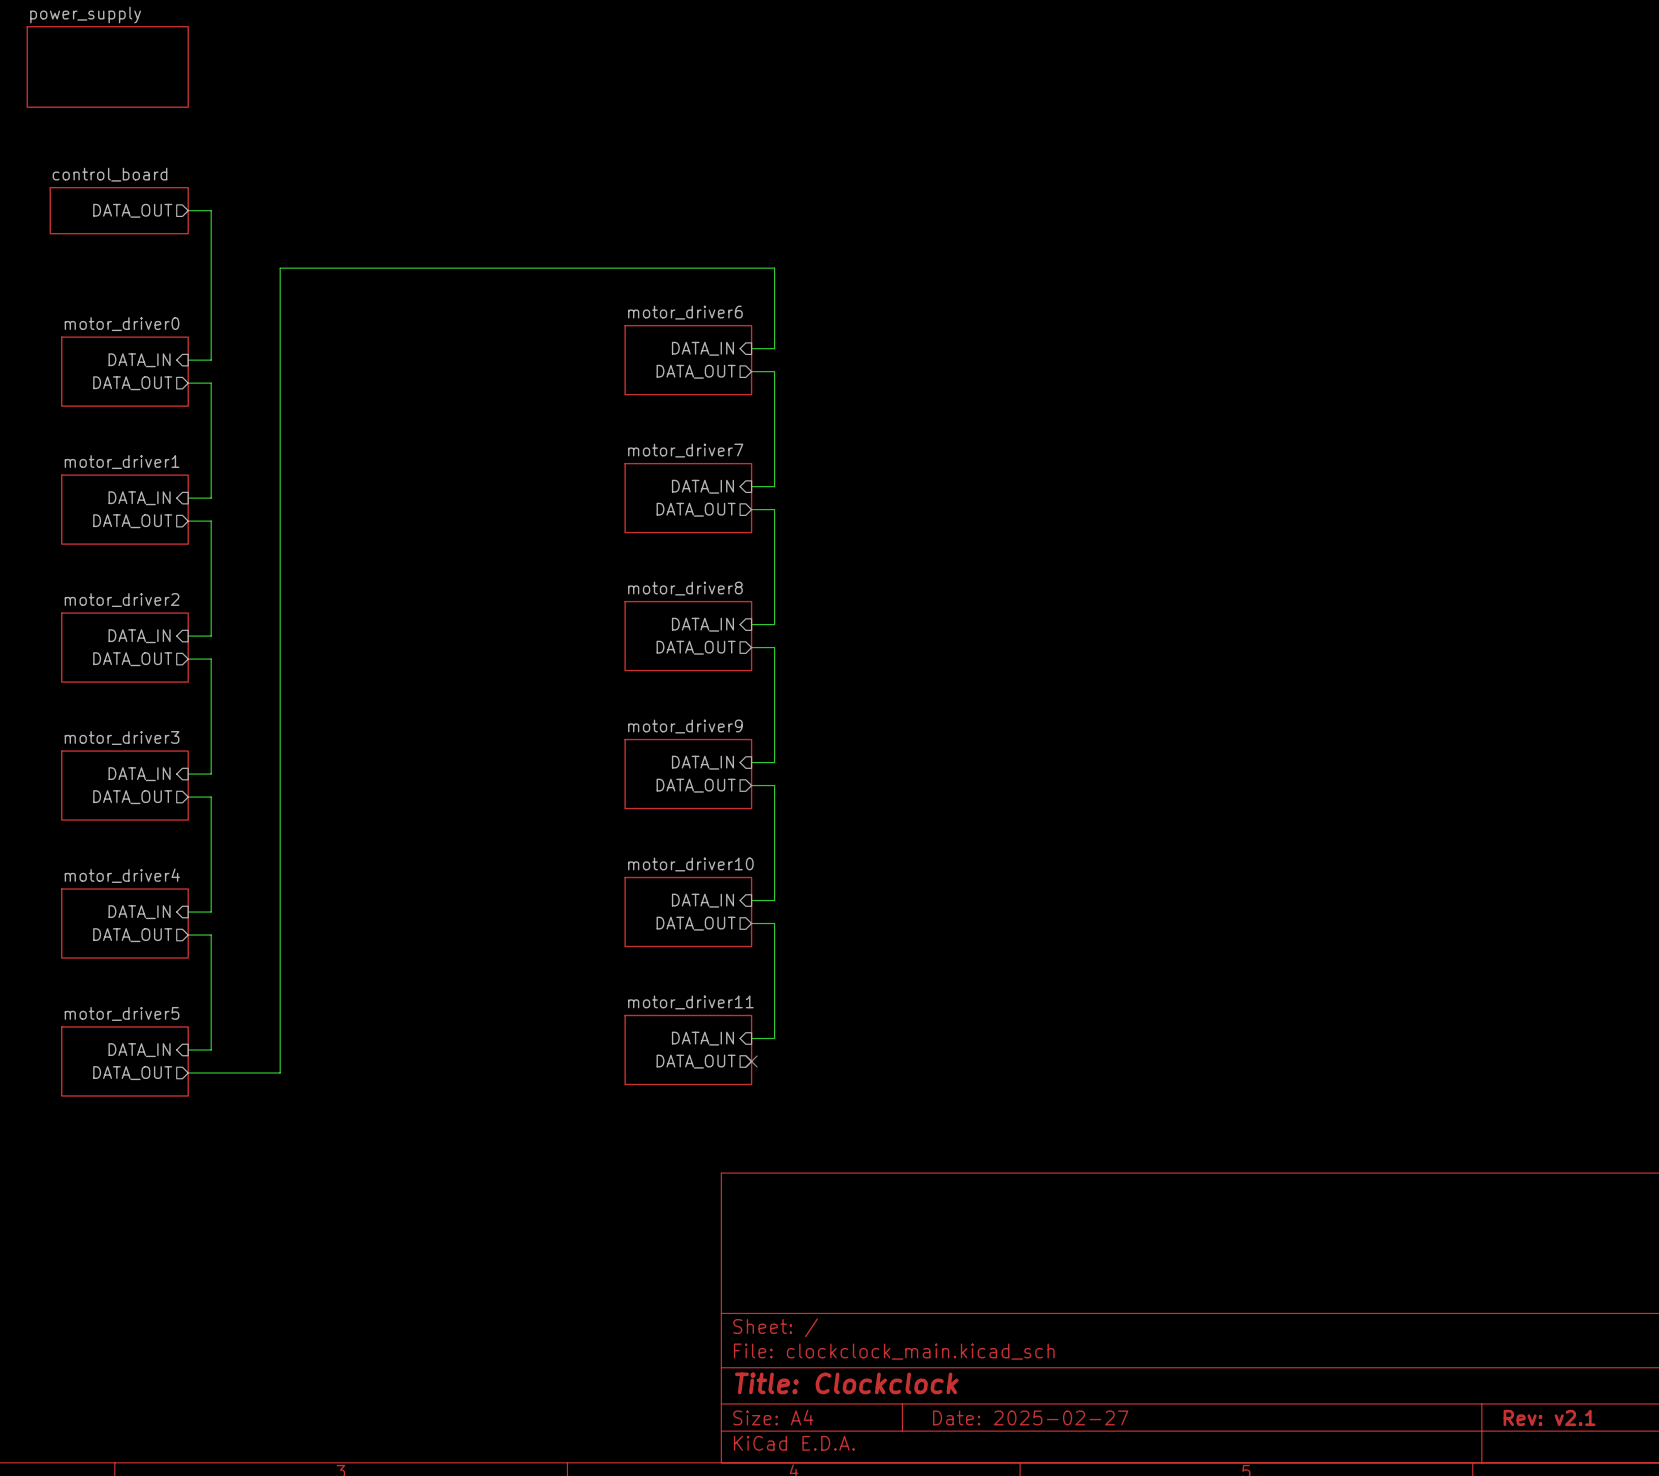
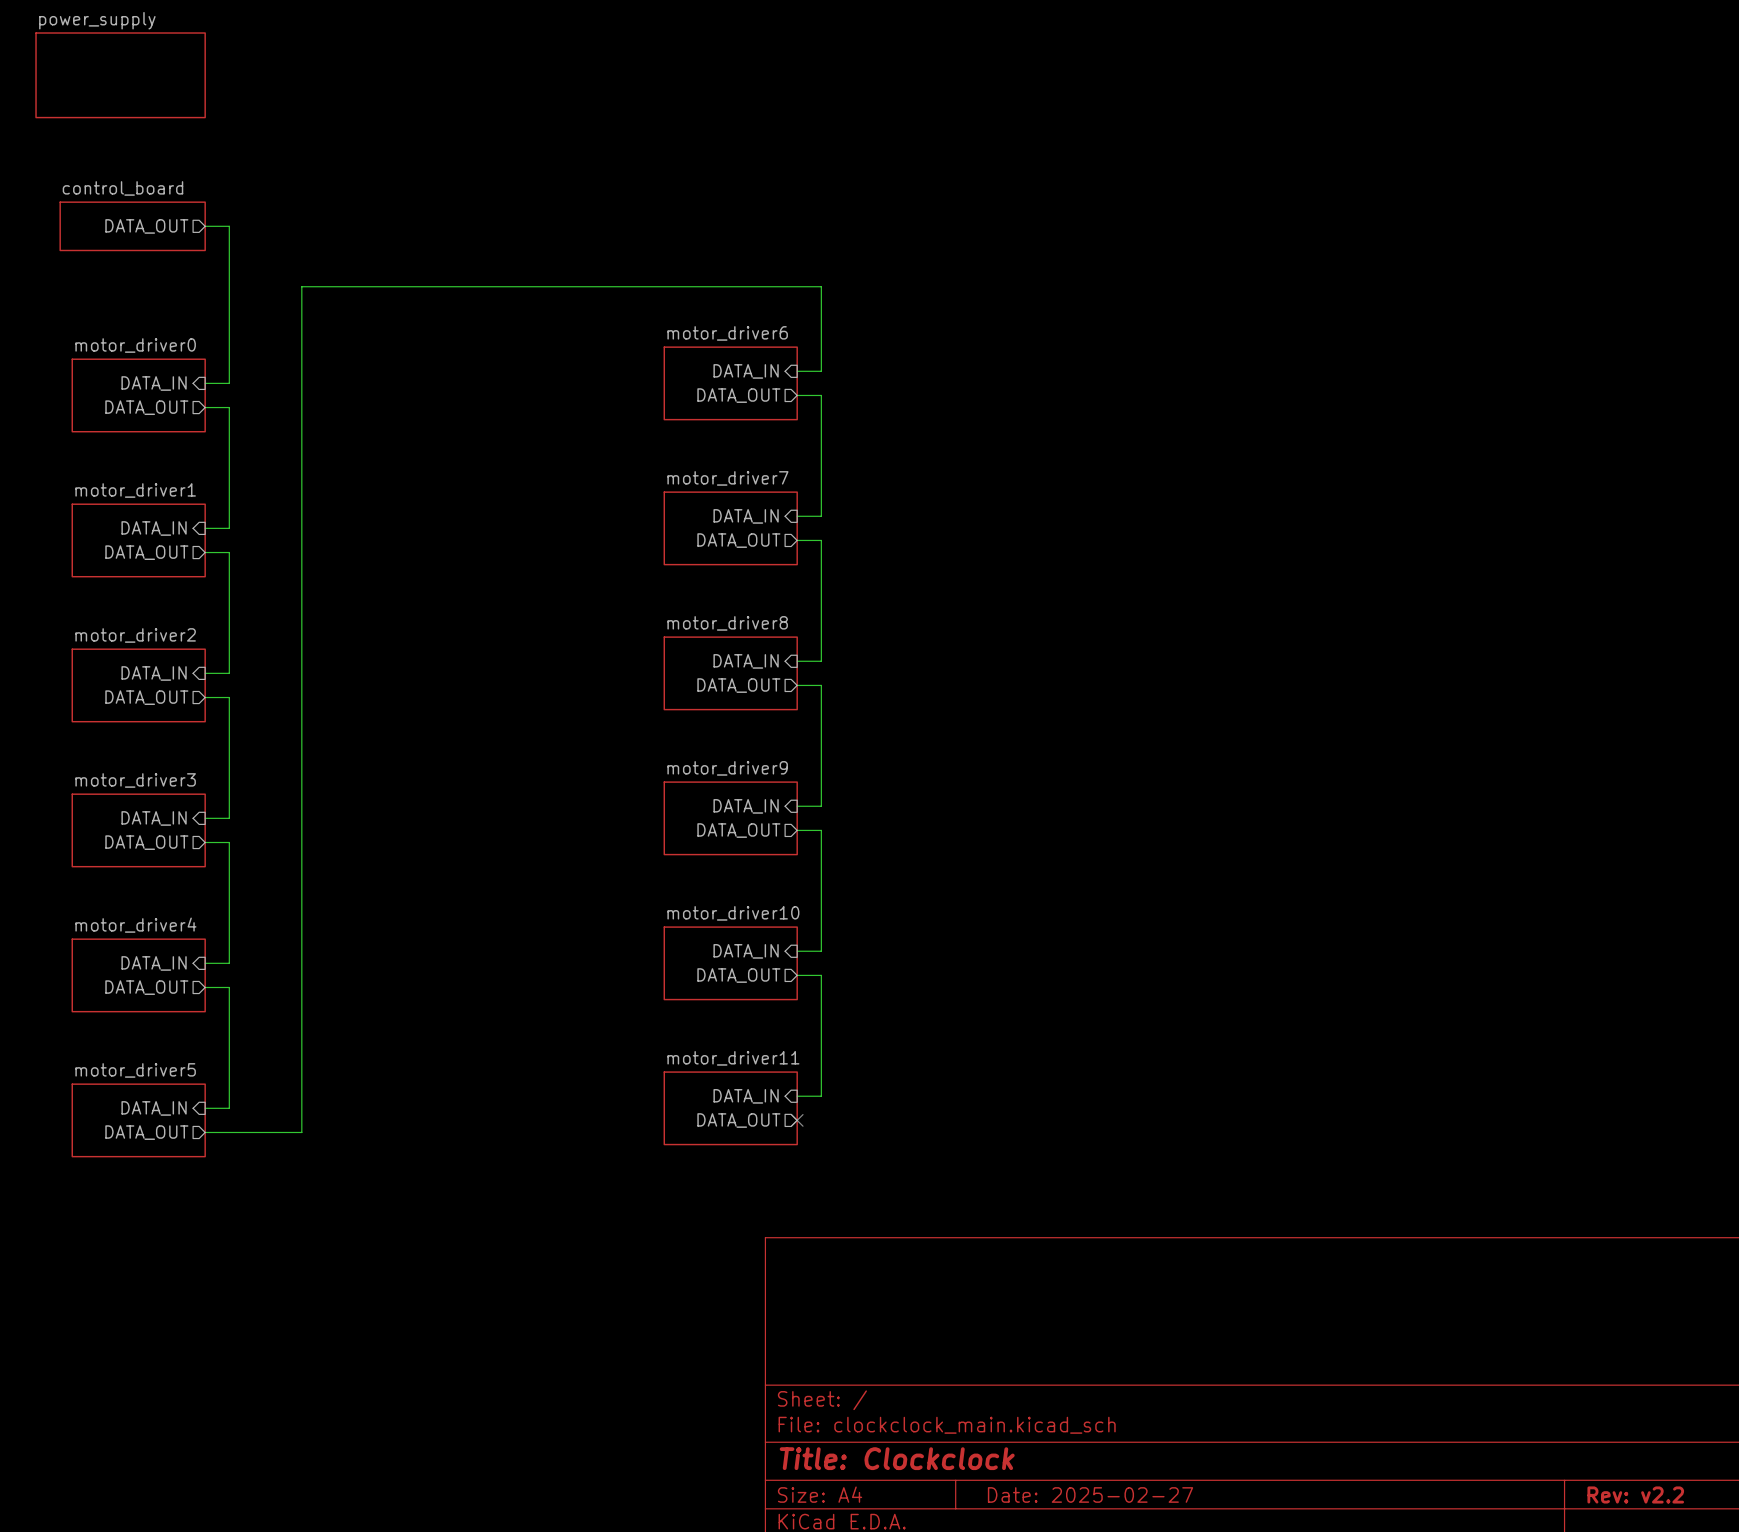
title block: Rev: v2.1 (1549, 1417) -> Rev: v2.2 (1635, 1494)

